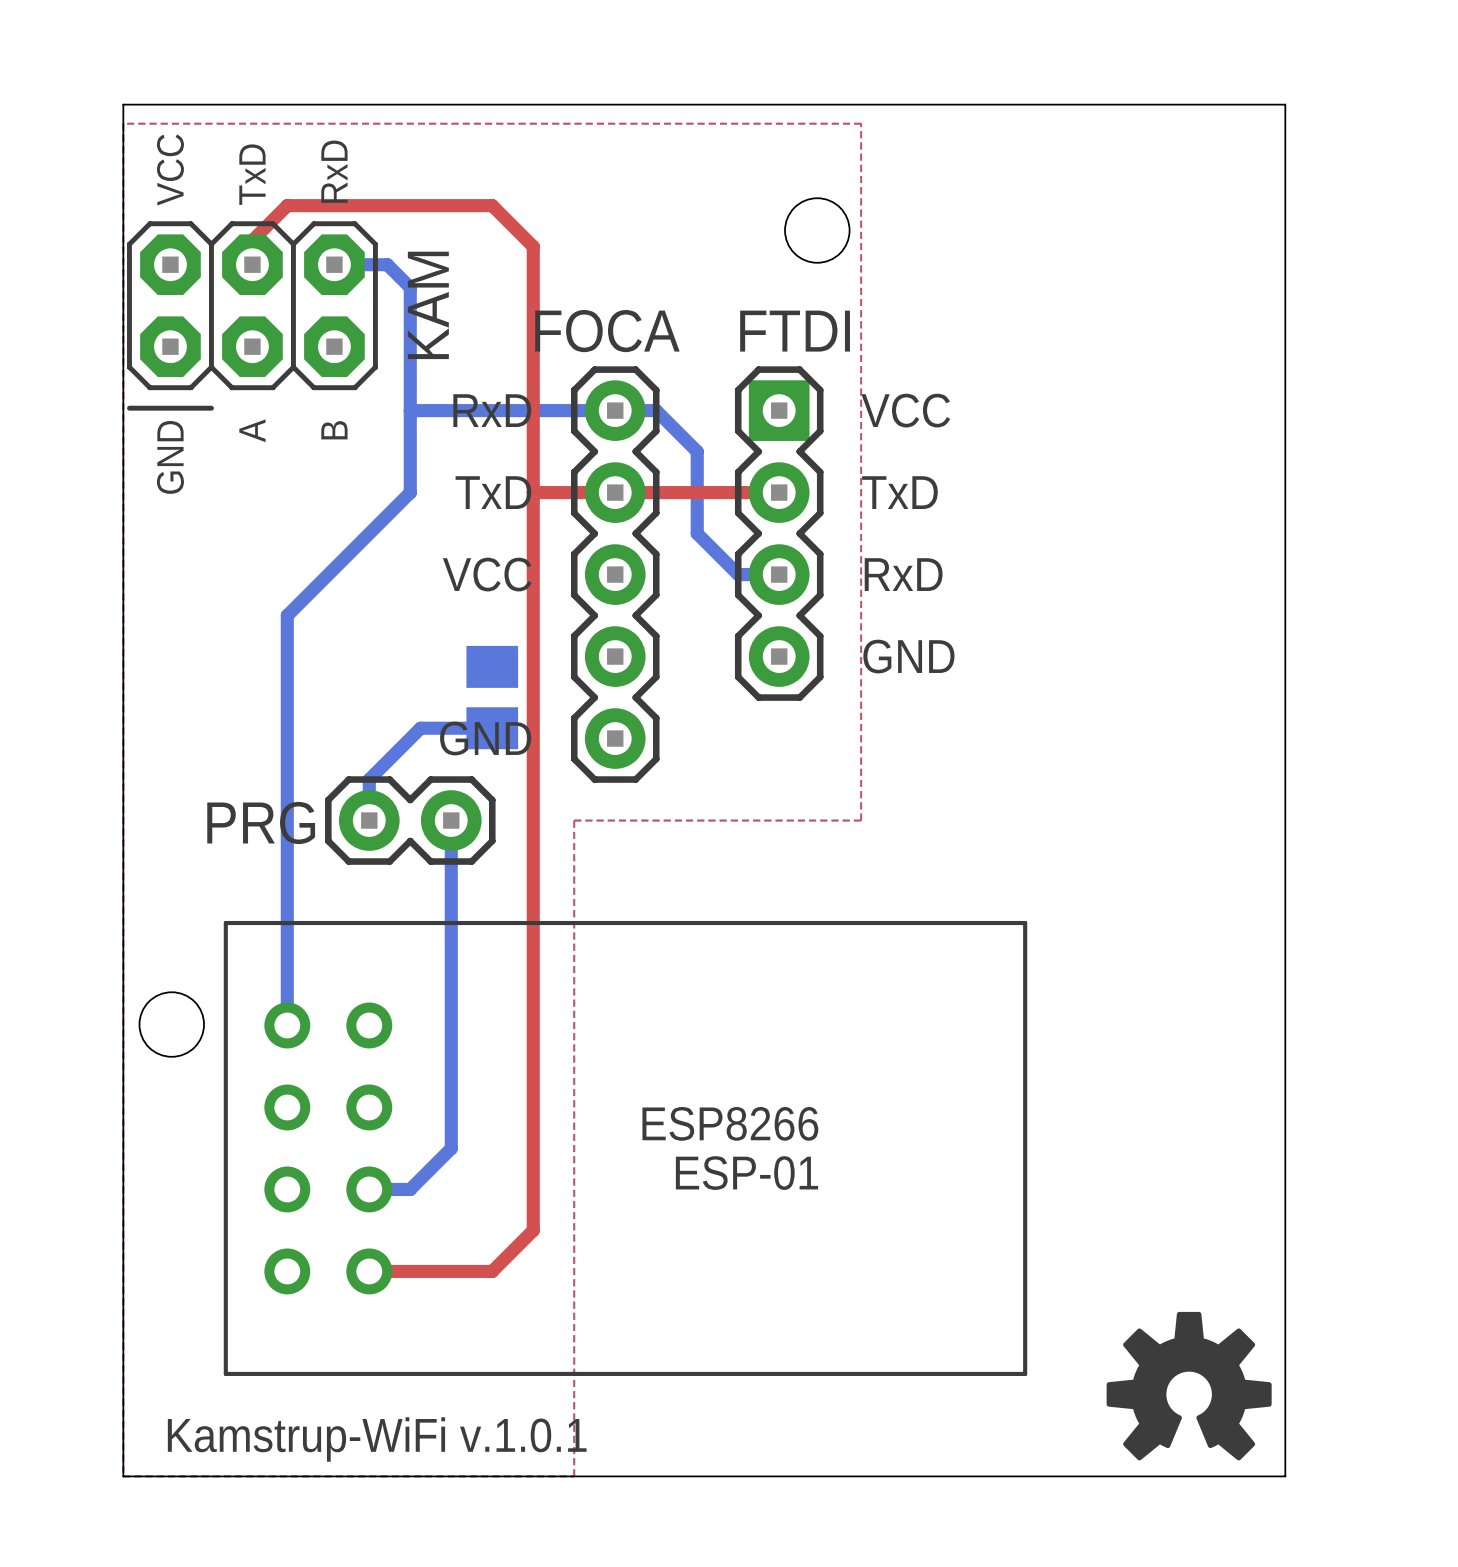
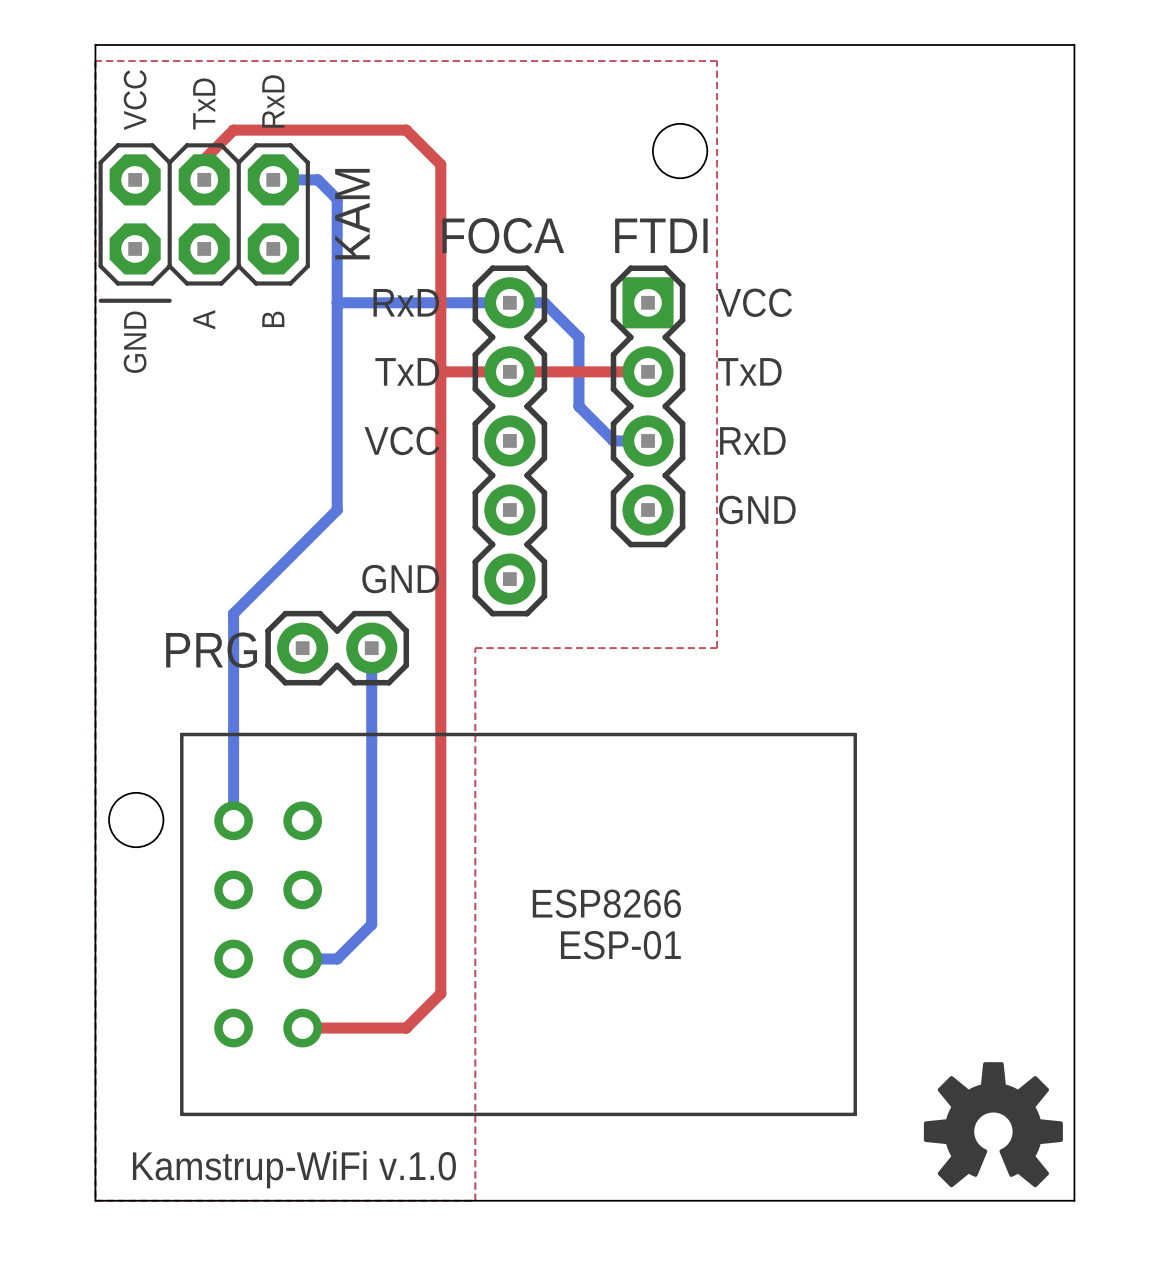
bottom track: (410, 492) (287, 615) (287, 779) -> (337, 371) (337, 510) (233, 613)
part: (492, 697) -> none
bottom track: (492, 728) (420, 728) (369, 779) (369, 820) -> none
text: Kamstrup-WiFi v.1.0.1 (377, 1439) -> Kamstrup-WiFi v.1.0 (294, 1169)

